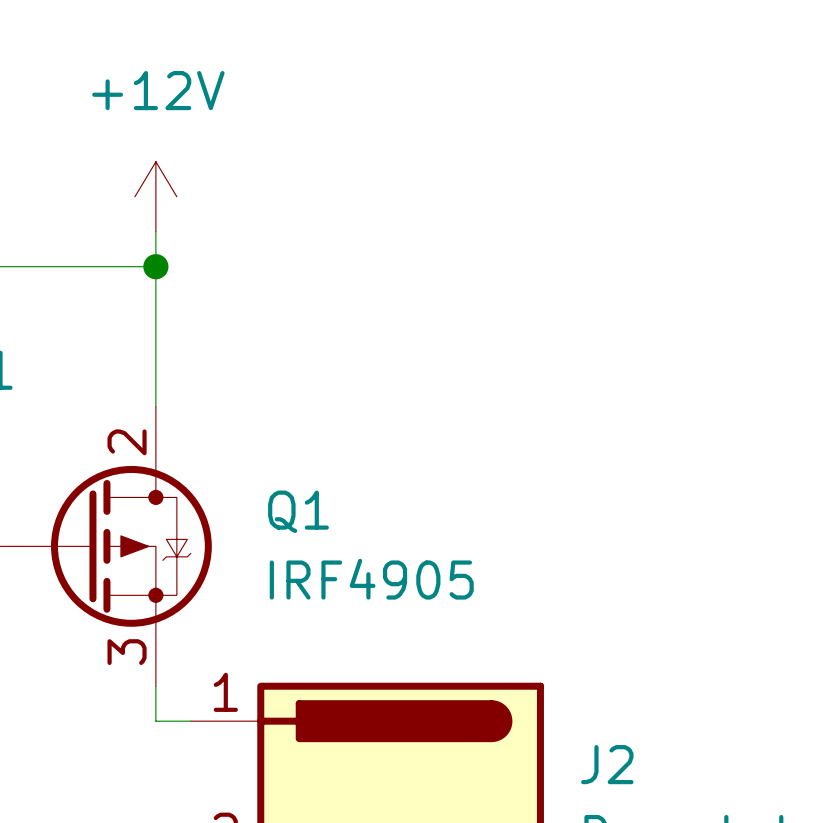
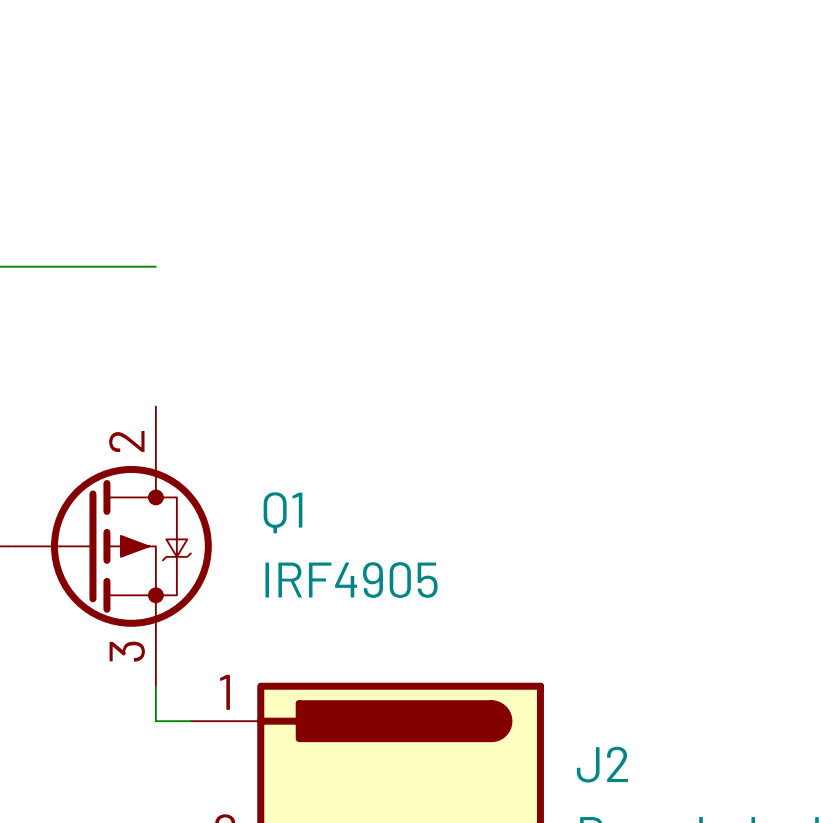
power symbol: +12V (155, 196) -> none
wire: (155, 231) (155, 406) -> none
junction: (155, 266) -> none

